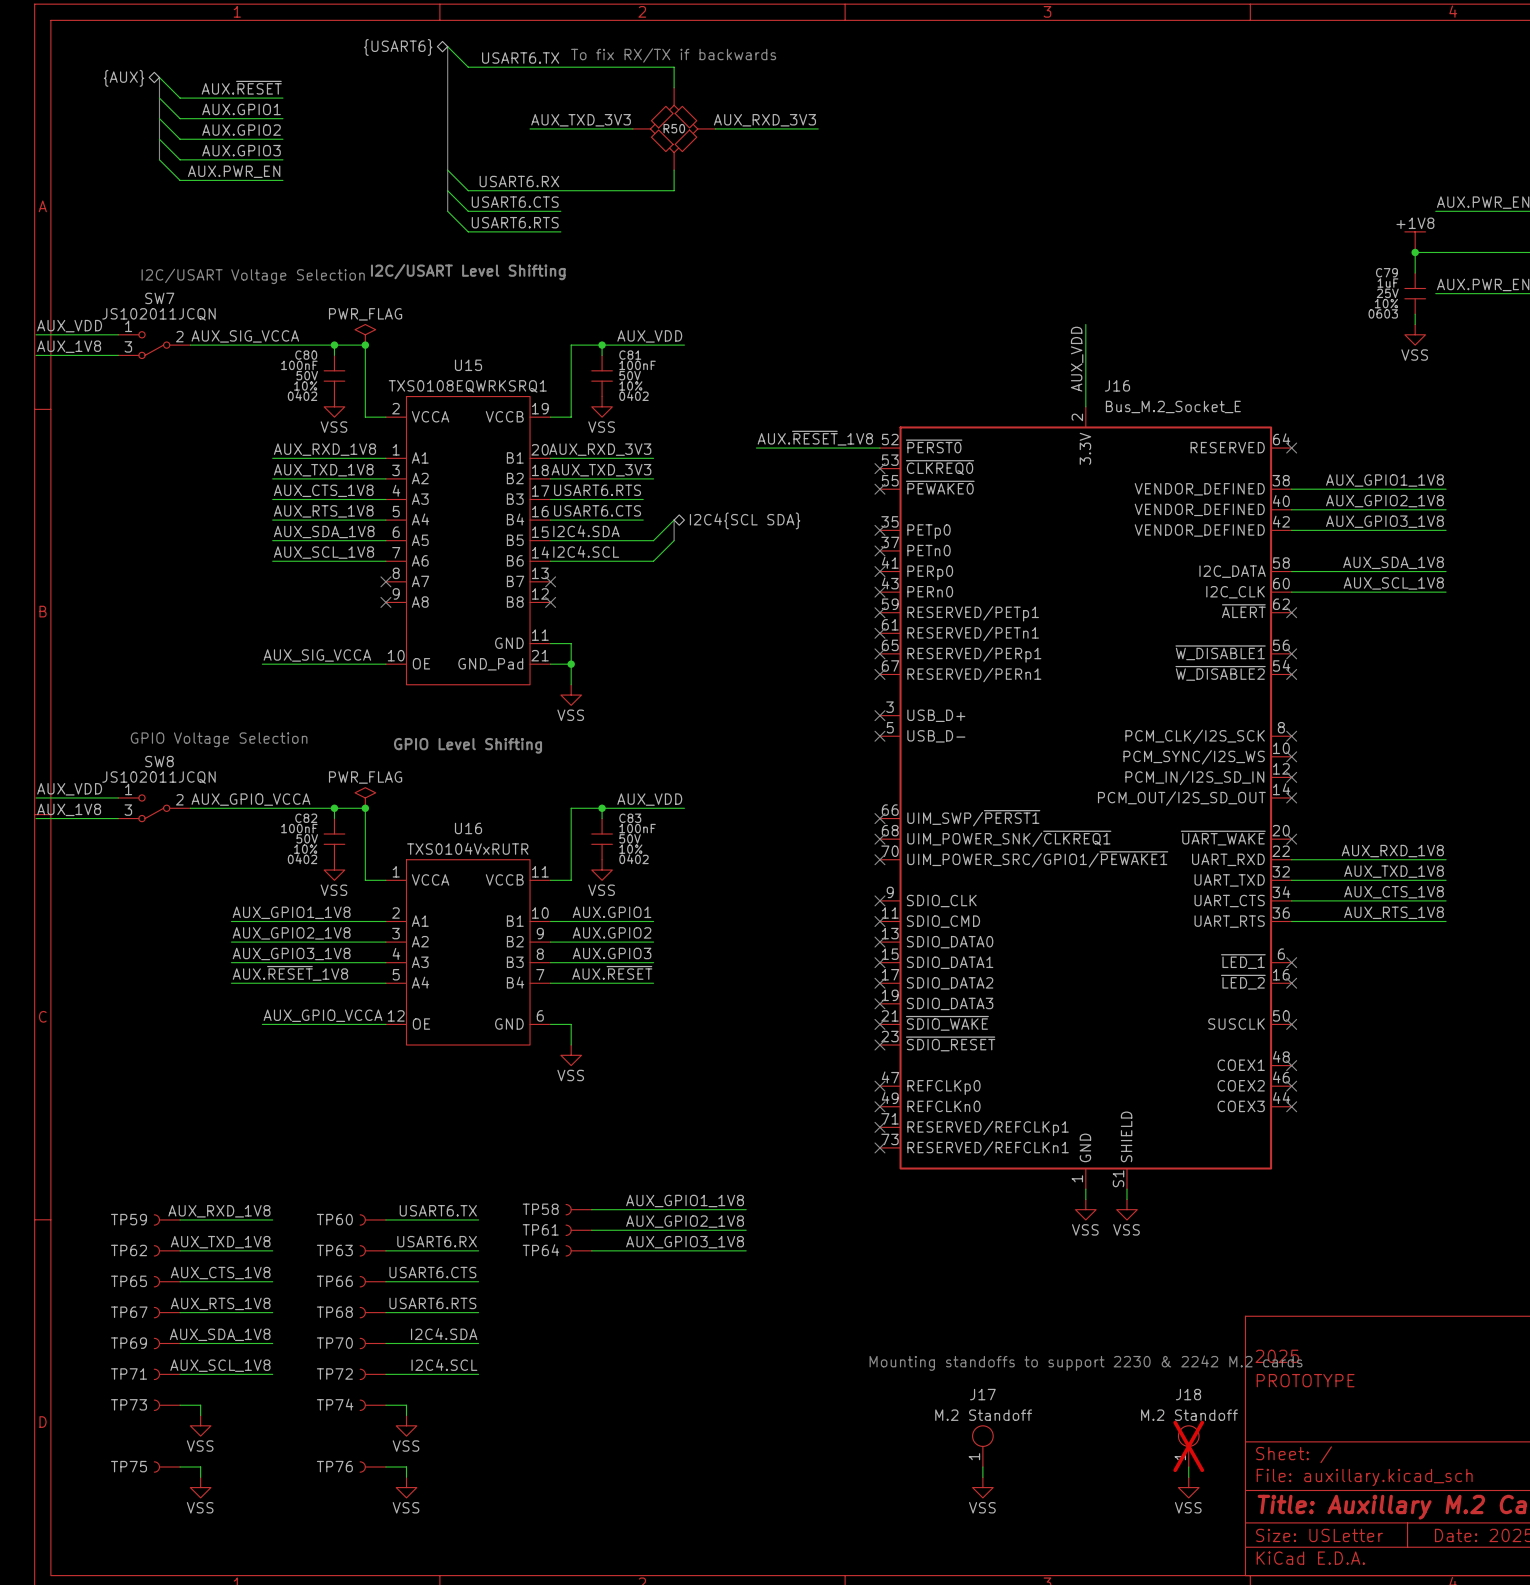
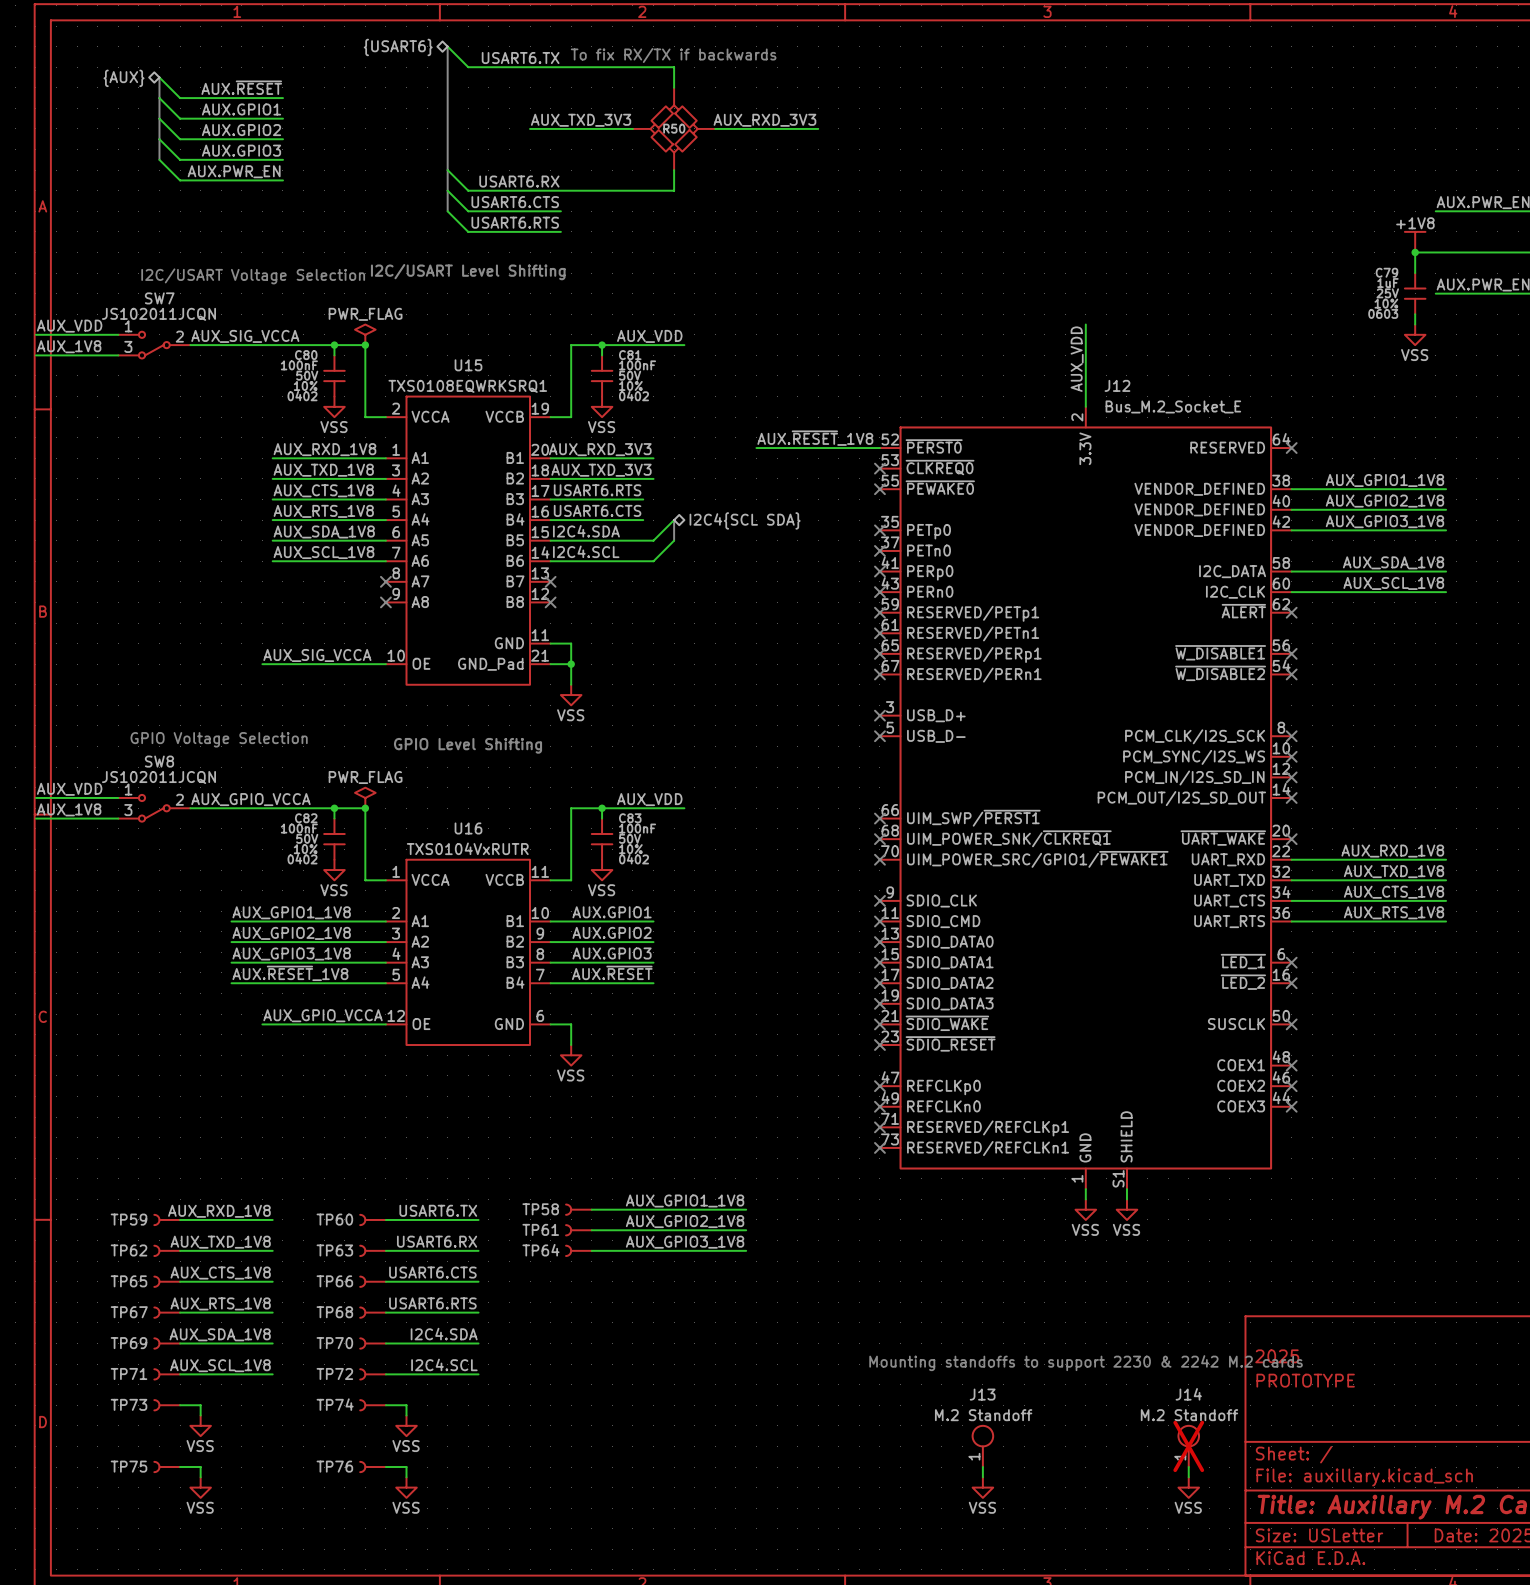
J16 name: J16 (1117, 385) -> J12 (1117, 385)
J17 name: J17 (982, 1394) -> J13 (982, 1394)
J18 name: J18 (1188, 1394) -> J14 (1188, 1394)

